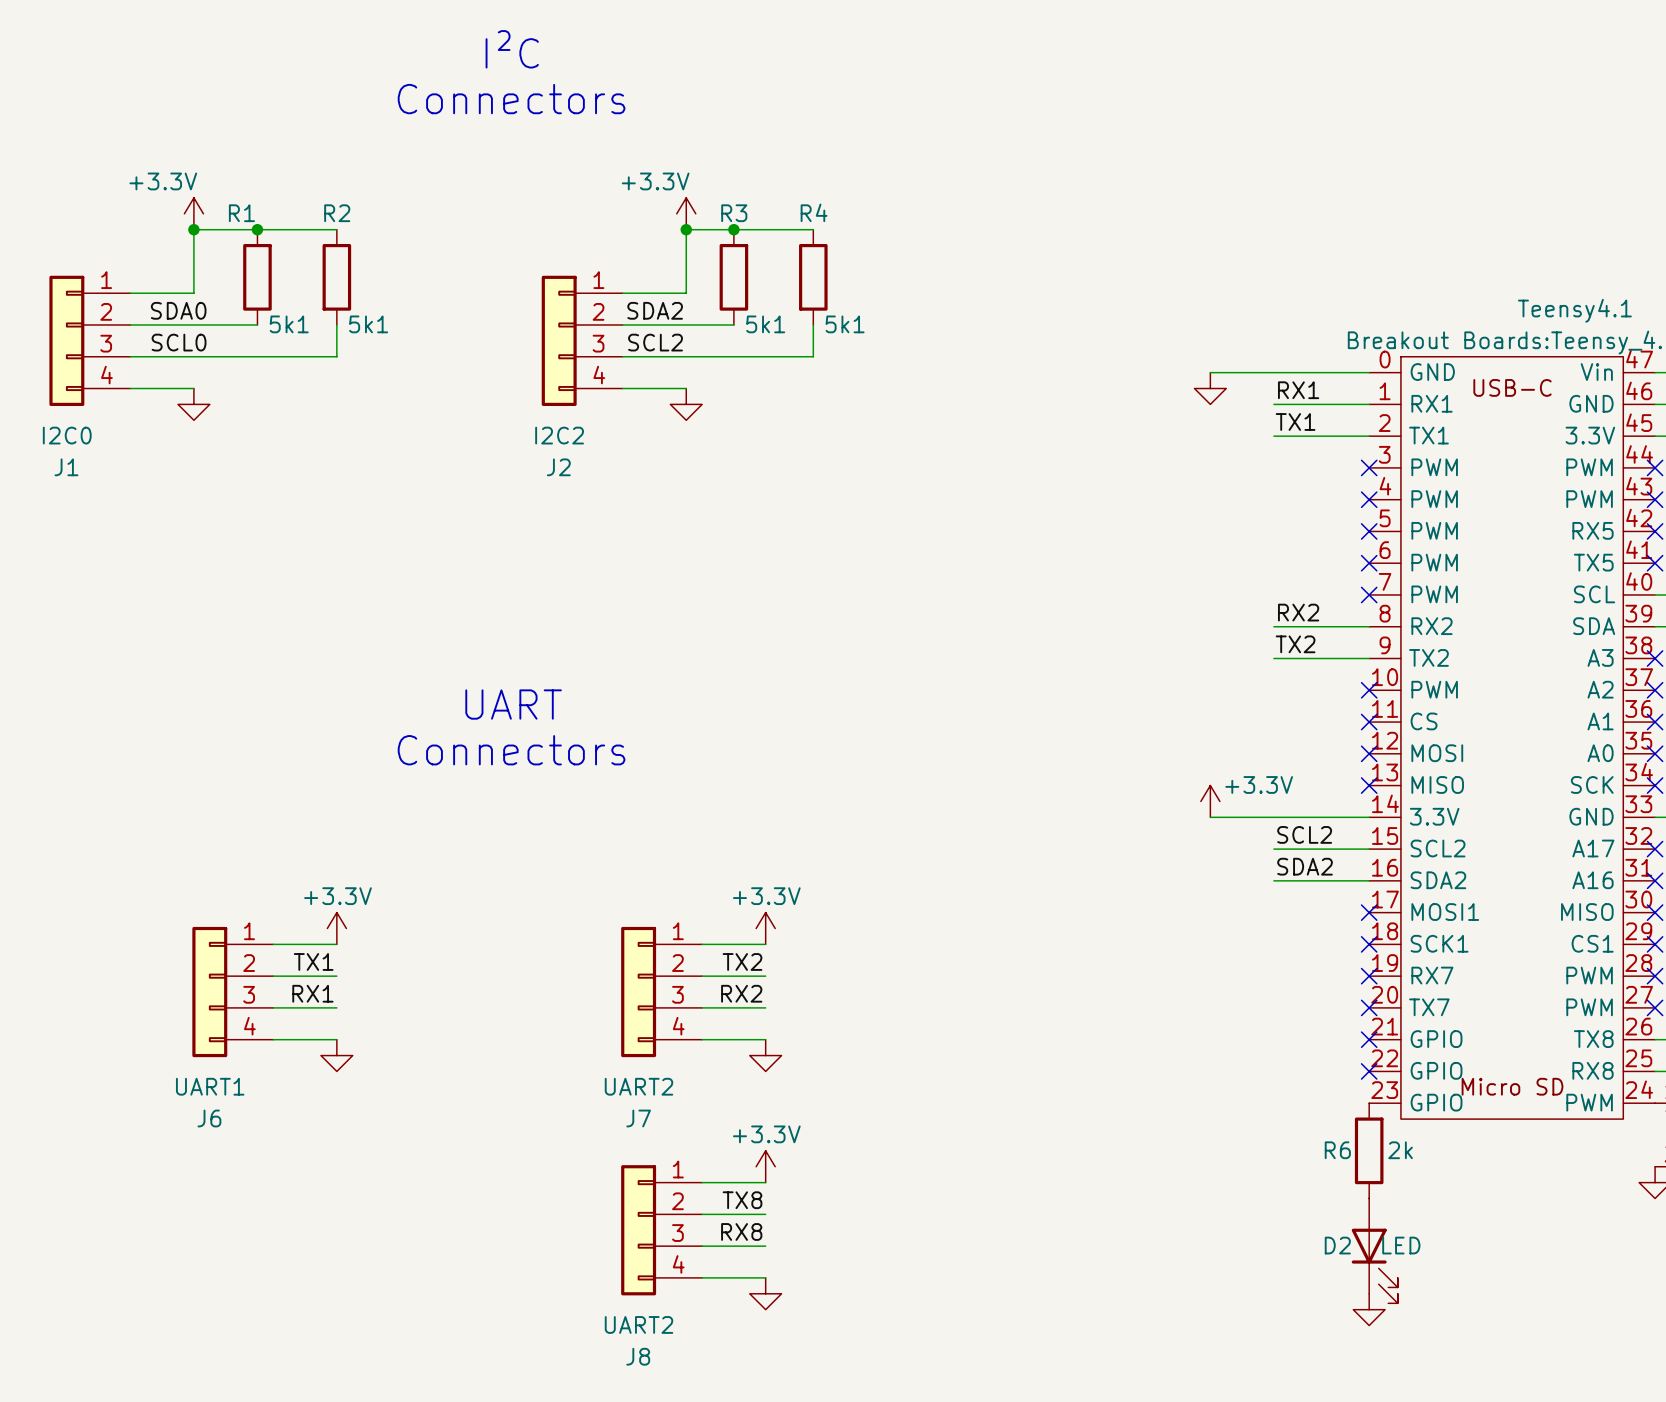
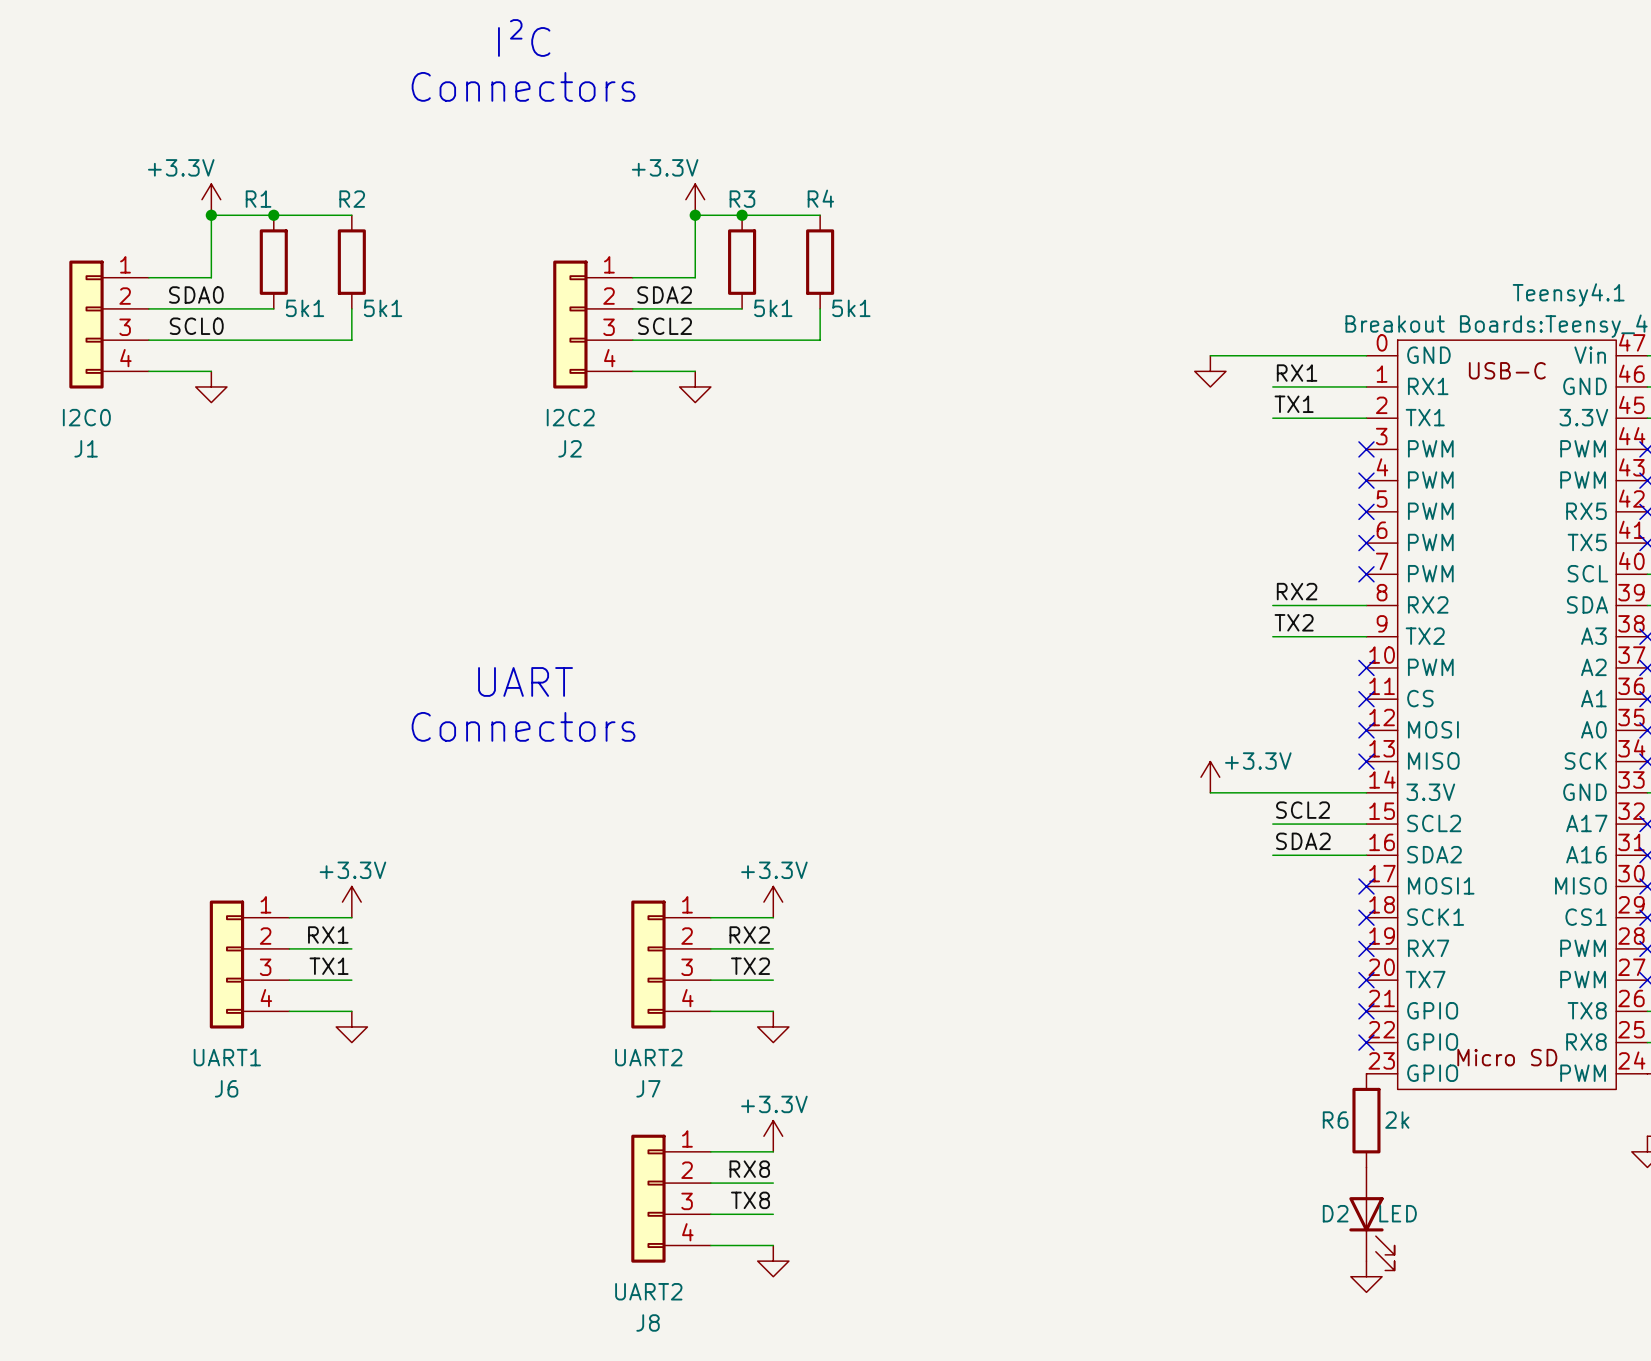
label: TX1 (313, 961) -> RX1 (328, 934)
label: TX2 (742, 961) -> RX2 (749, 934)
label: RX1 (312, 993) -> TX1 (329, 966)
label: RX2 (741, 993) -> TX2 (750, 966)
label: TX8 (742, 1200) -> RX8 (749, 1169)
label: RX8 (741, 1231) -> TX8 (750, 1200)

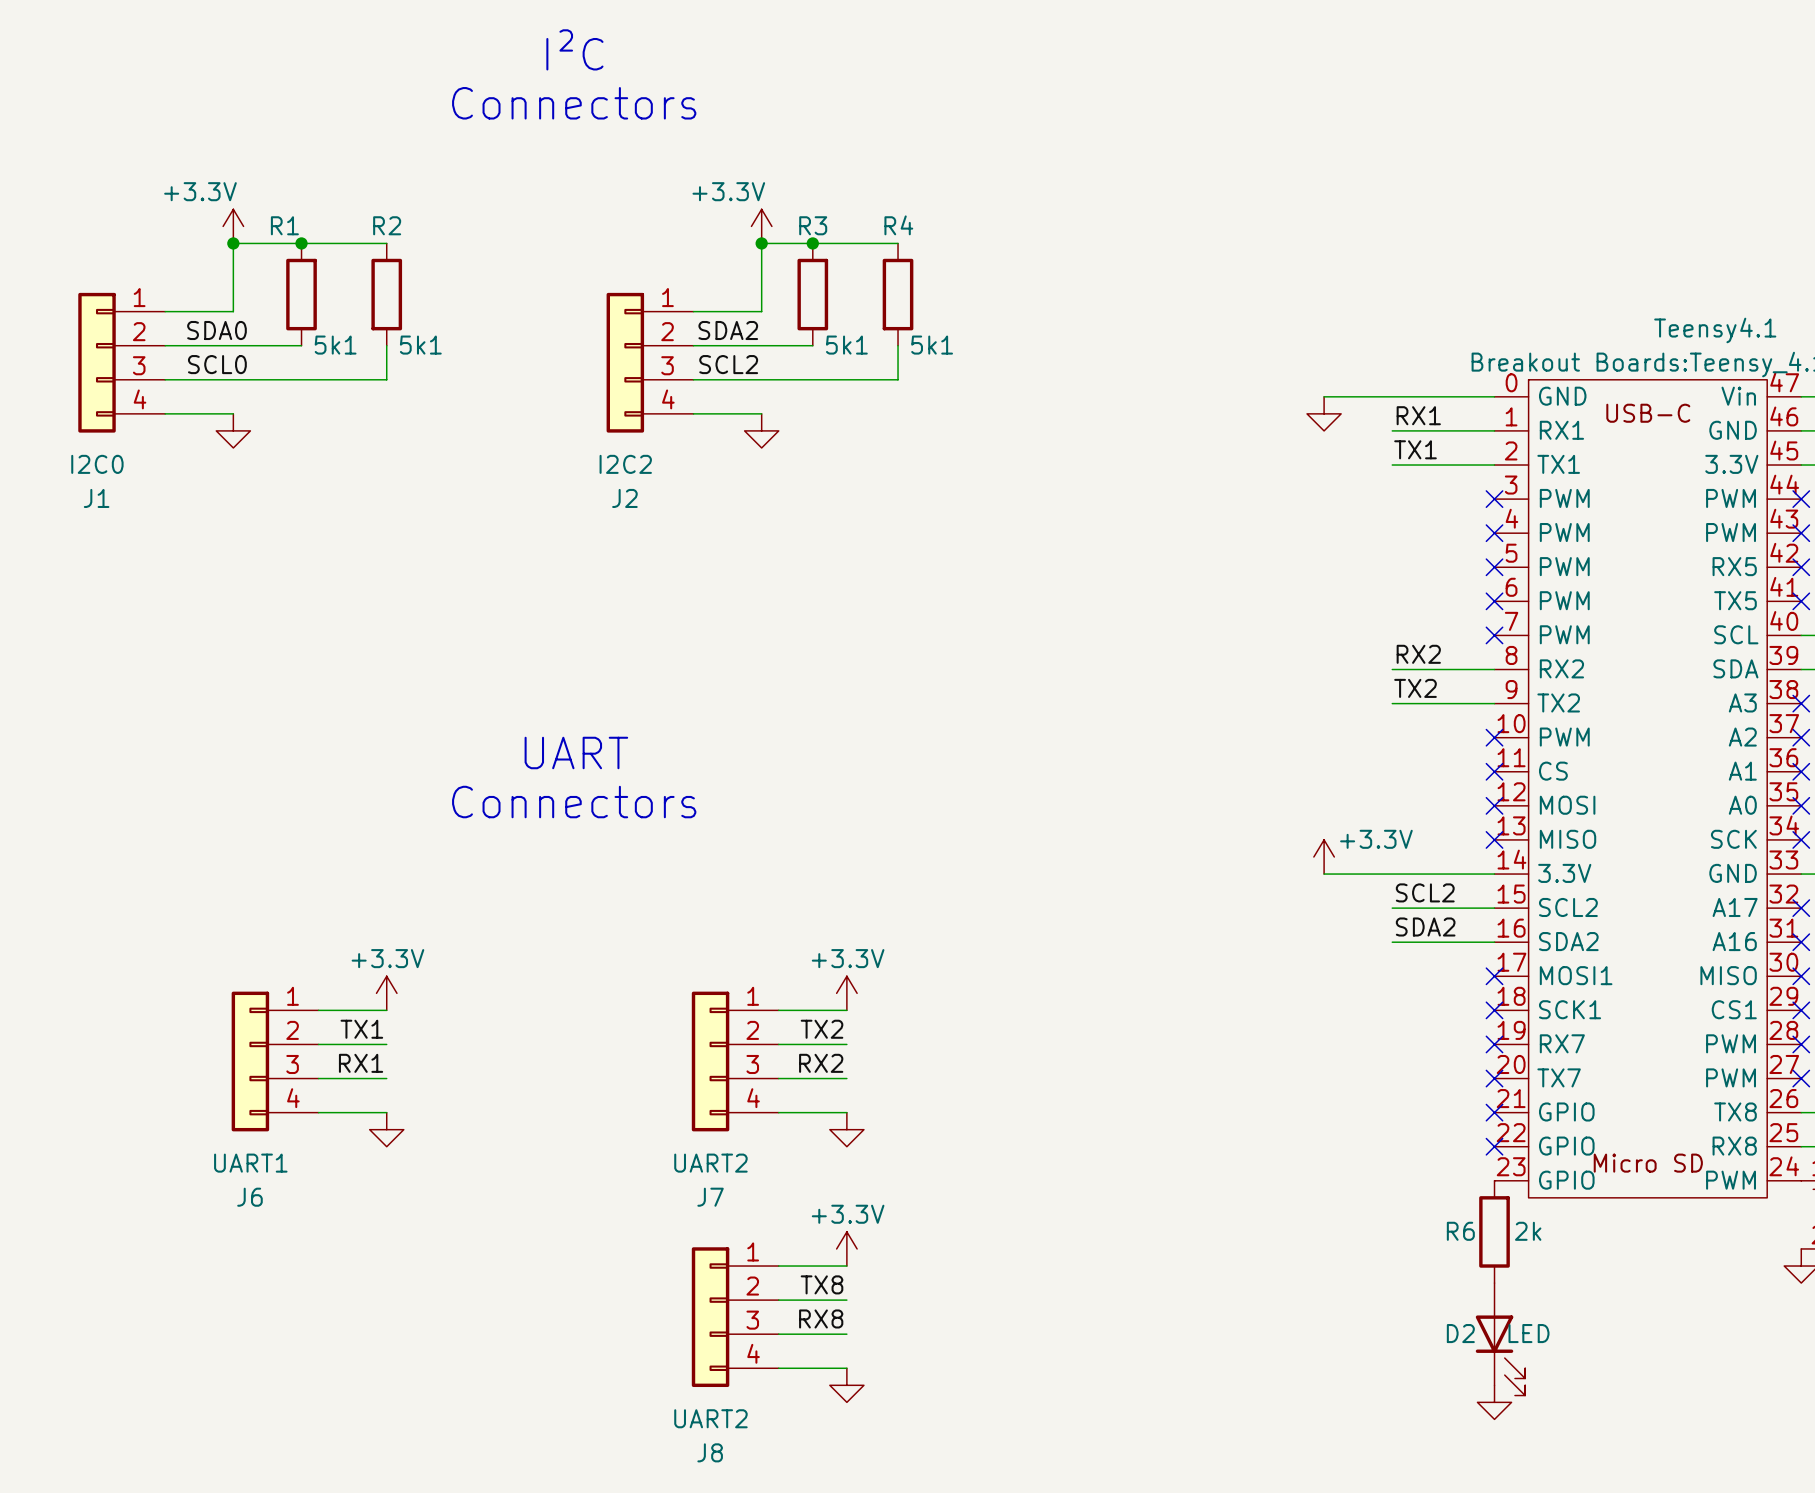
label: RX1 (328, 934) -> TX1 (361, 1029)
label: RX2 (749, 934) -> TX2 (822, 1029)
label: TX1 (329, 966) -> RX1 (361, 1063)
label: TX2 (750, 966) -> RX2 (821, 1063)
label: RX8 (749, 1169) -> TX8 (822, 1284)
label: TX8 (750, 1200) -> RX8 (821, 1318)

